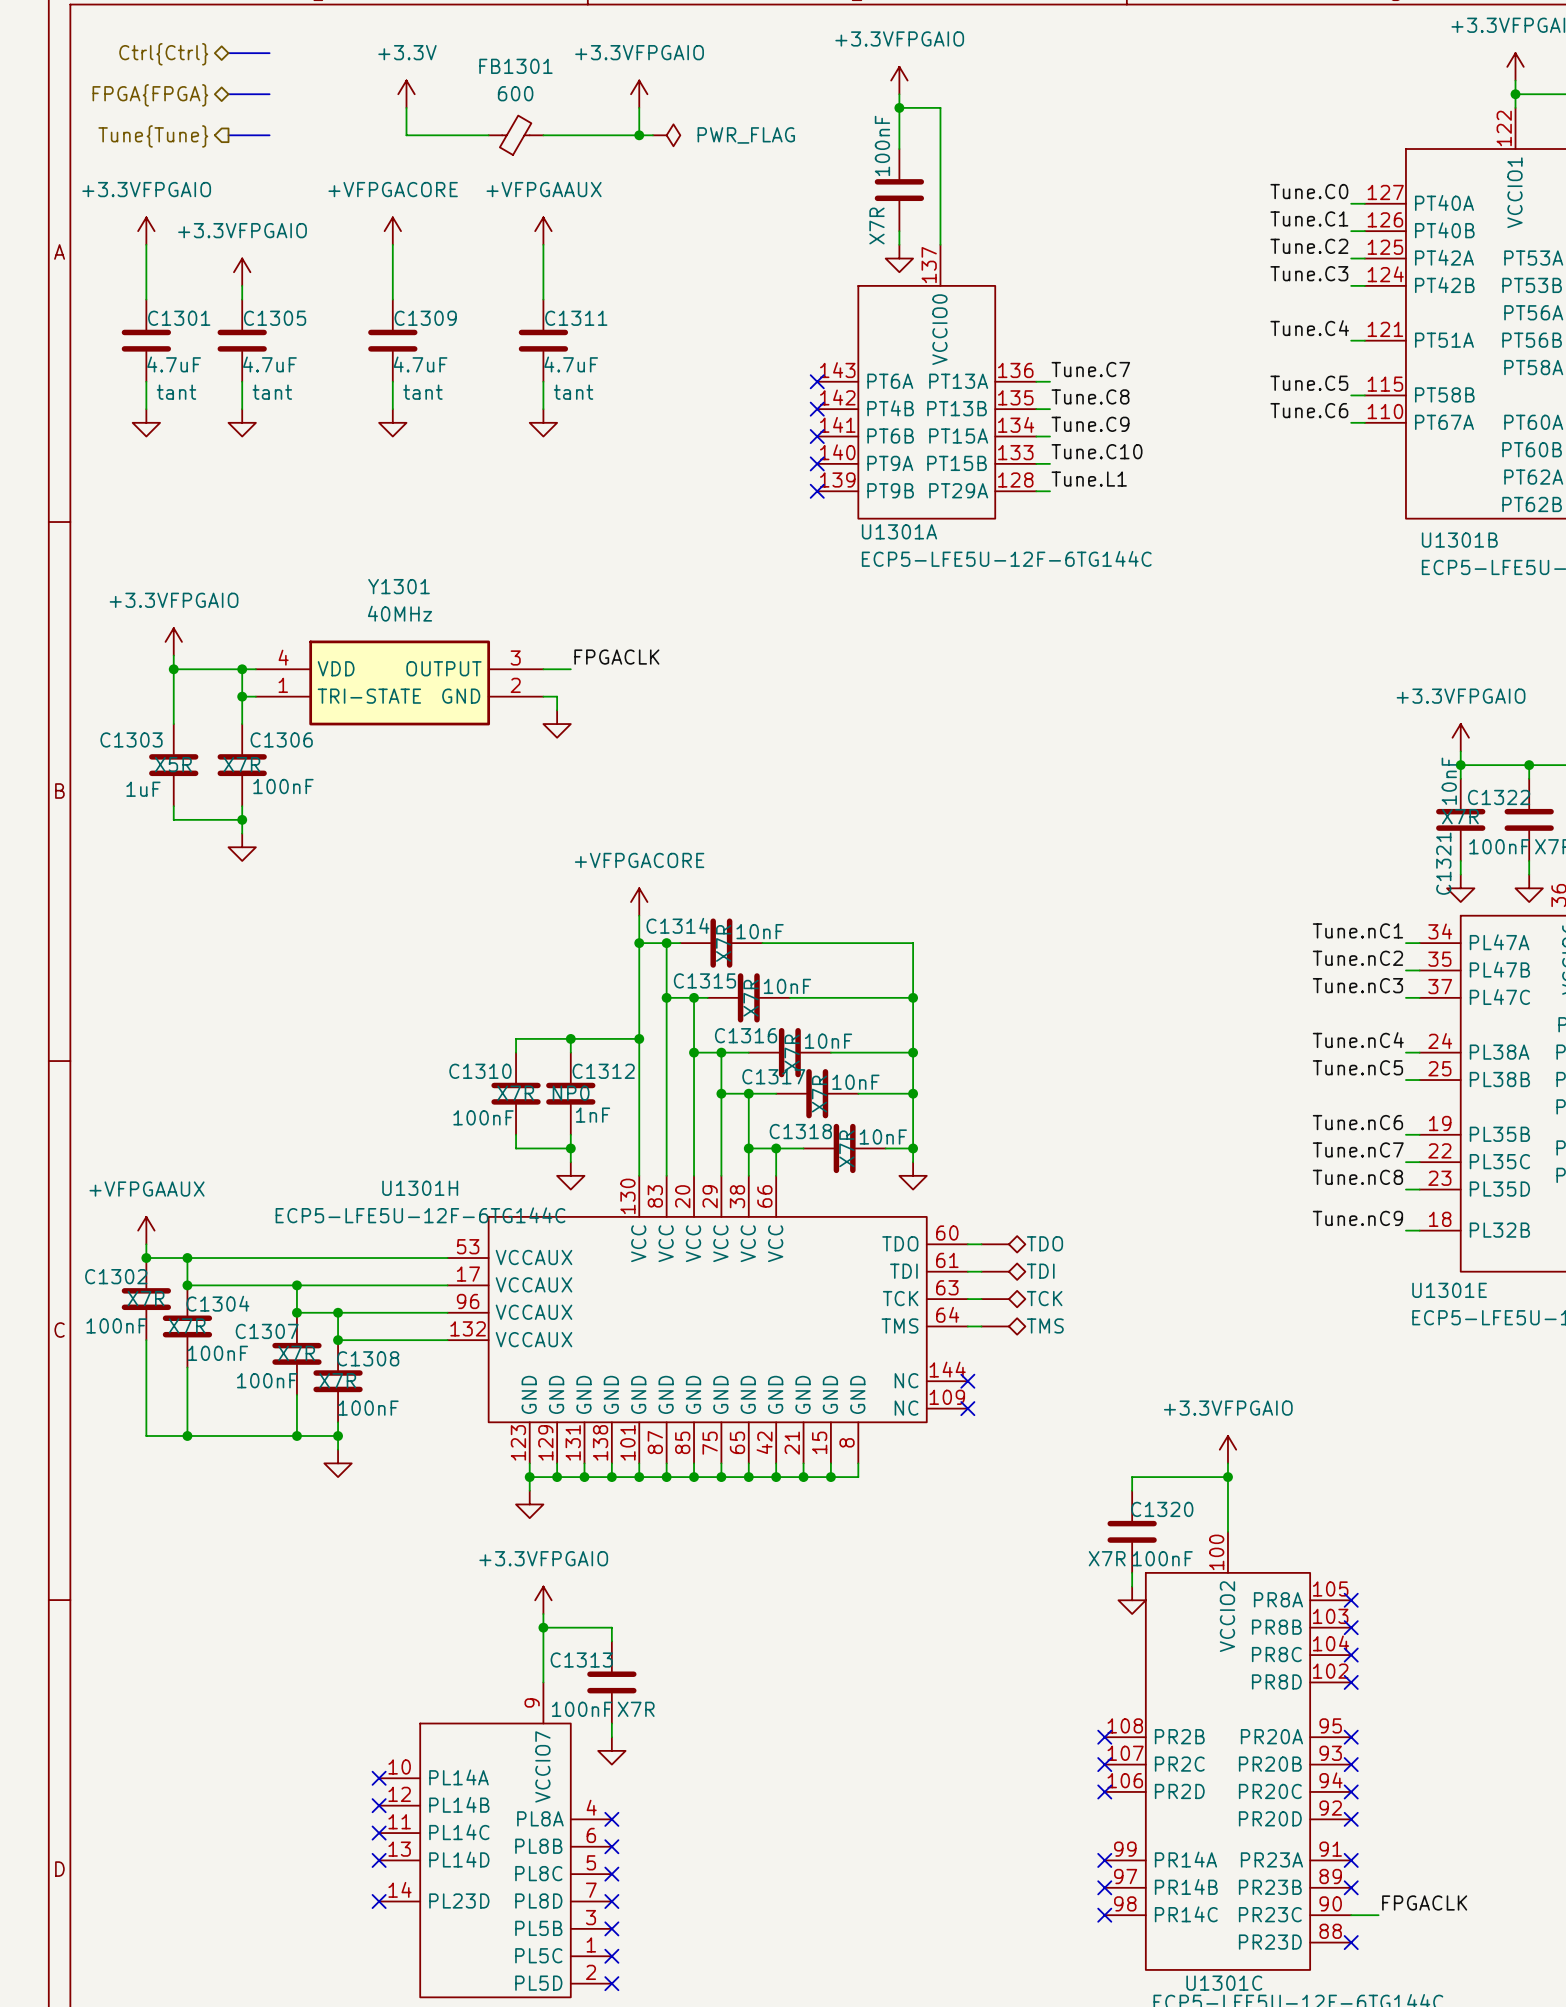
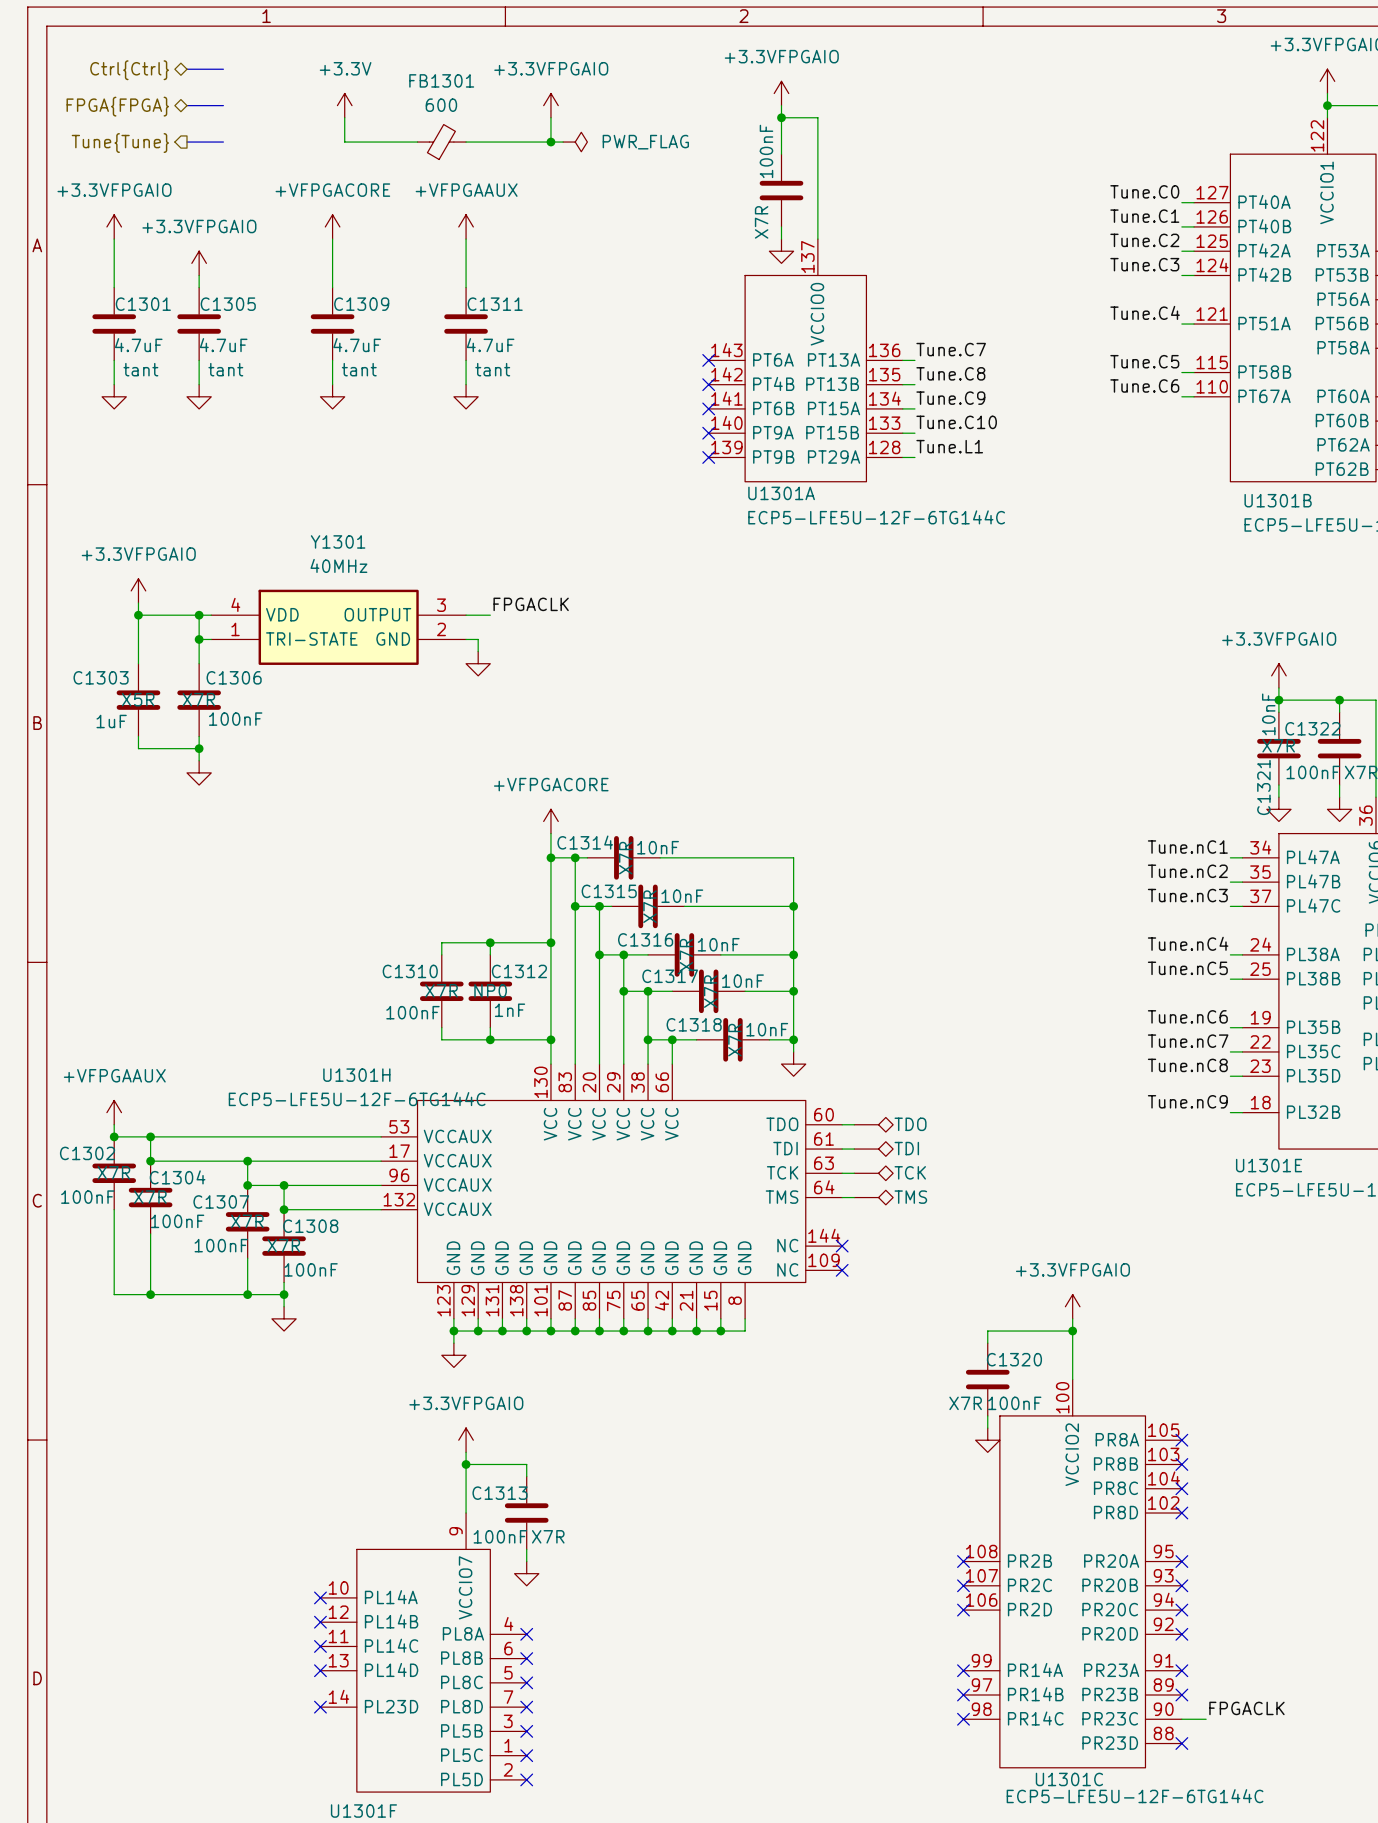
wire: (570, 1148) (570, 1162) -> (490, 1039) (550, 1039)
junction: none -> (550, 1039)
power symbol: (570, 1175) -> none

